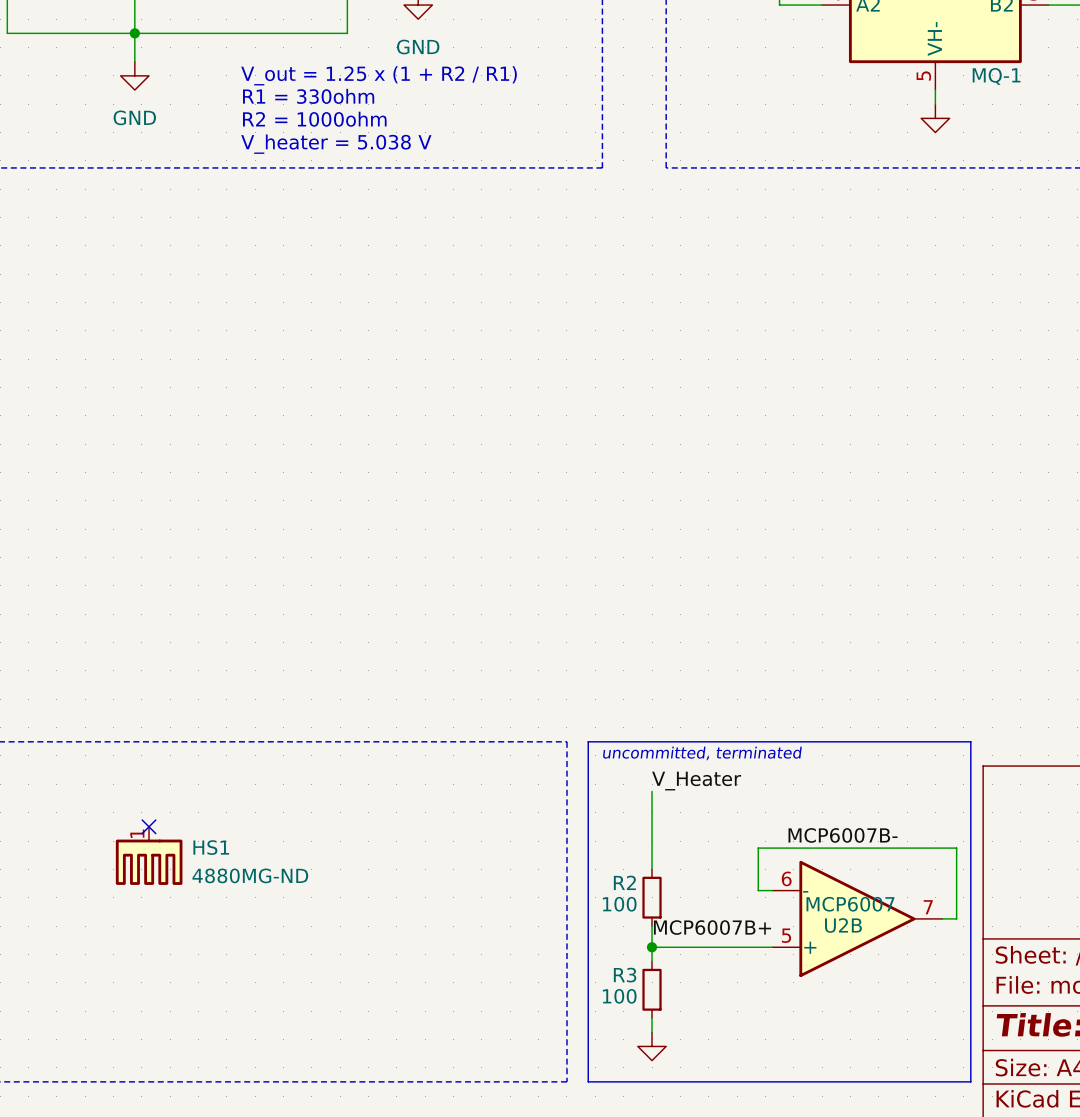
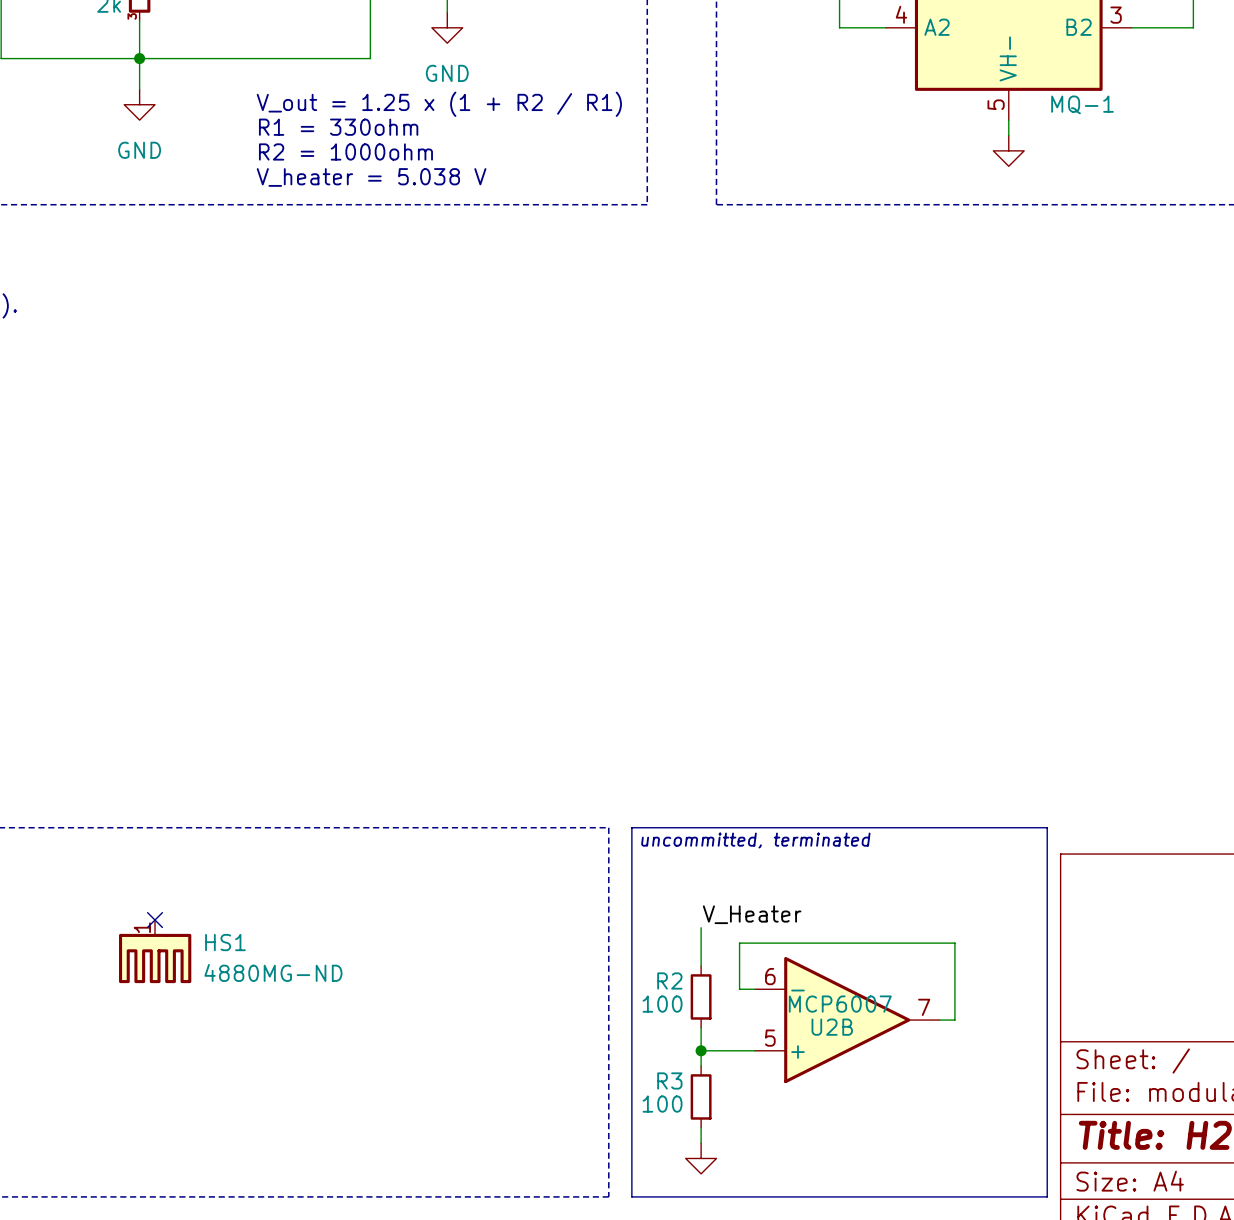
label position: V_Heater (696, 781) -> V_Heater (752, 914)
wire: (652, 791) (652, 833) -> none
label: MCP6007B- (843, 835) -> none
wire: (758, 848) (758, 890) (772, 890) -> (816, 943) (739, 943) (739, 989) (754, 989)
wire: (885, 848) (956, 848) (956, 918) (942, 918) -> (954, 943) (954, 1020) (939, 1020)
U2B position: (857, 918) -> (847, 1020)
label: MCP6007B+ (712, 927) -> none

